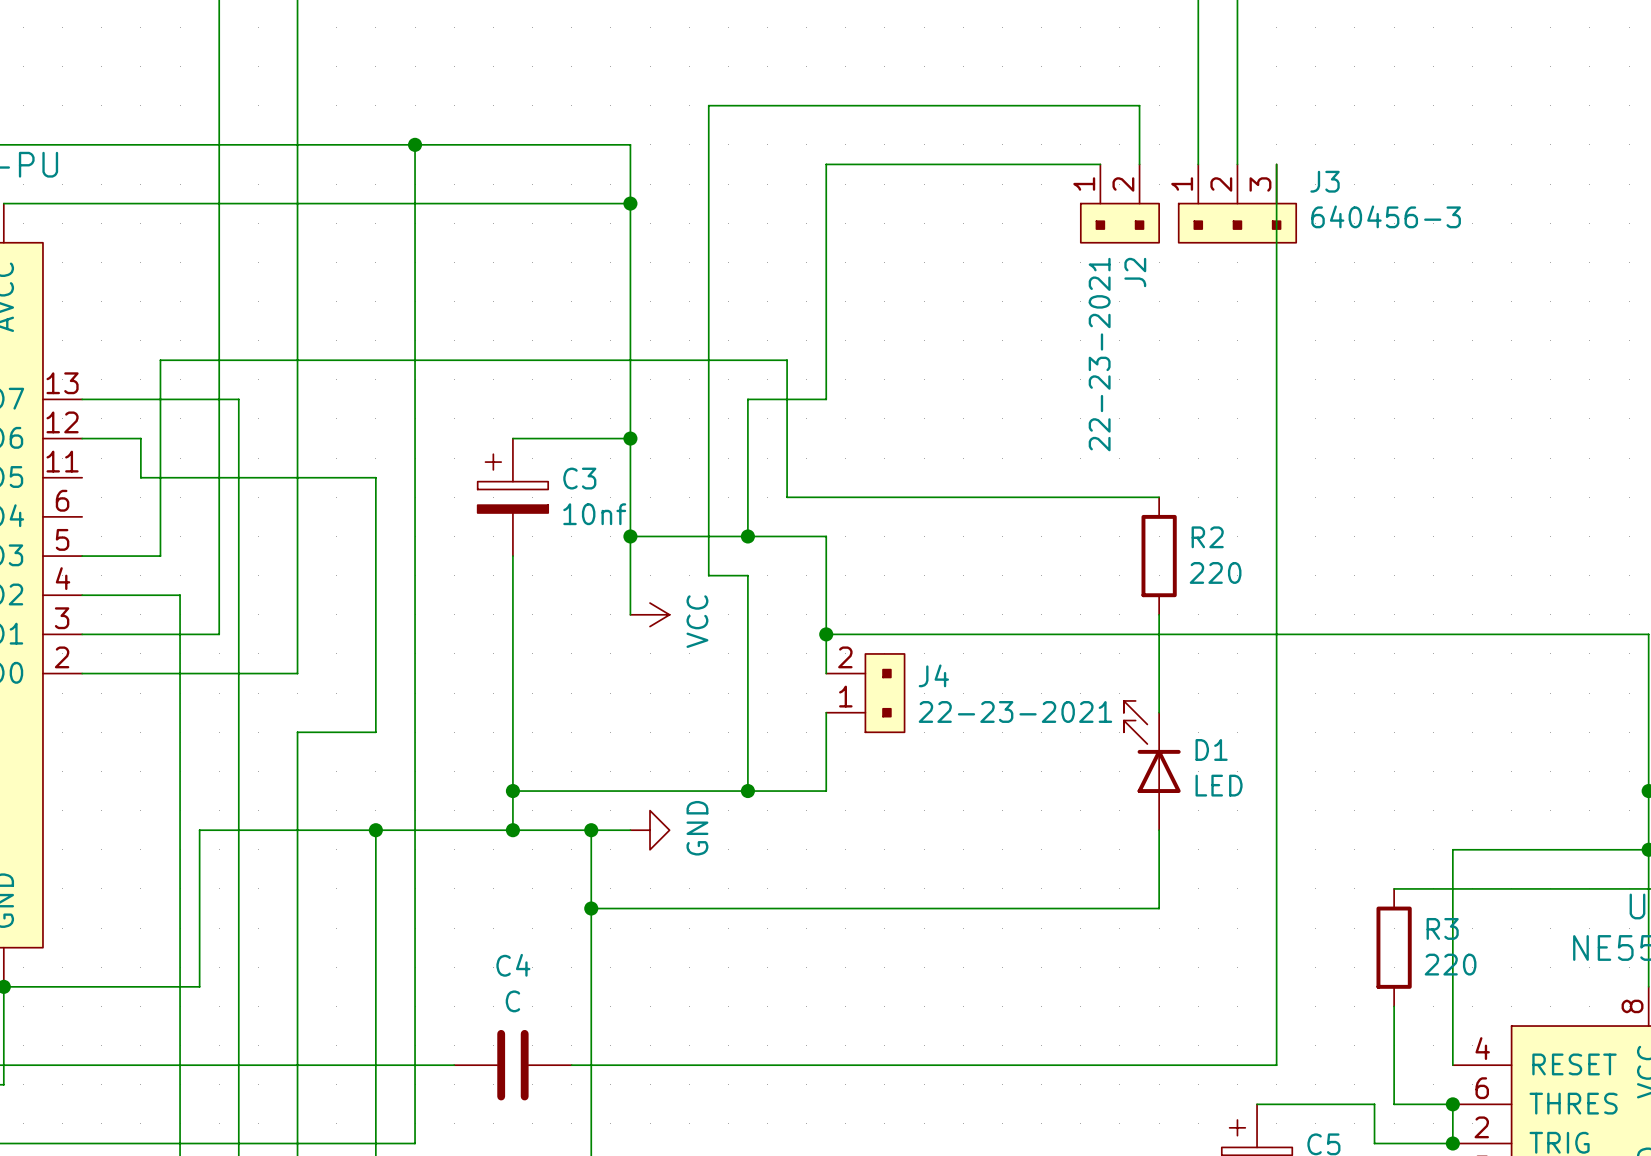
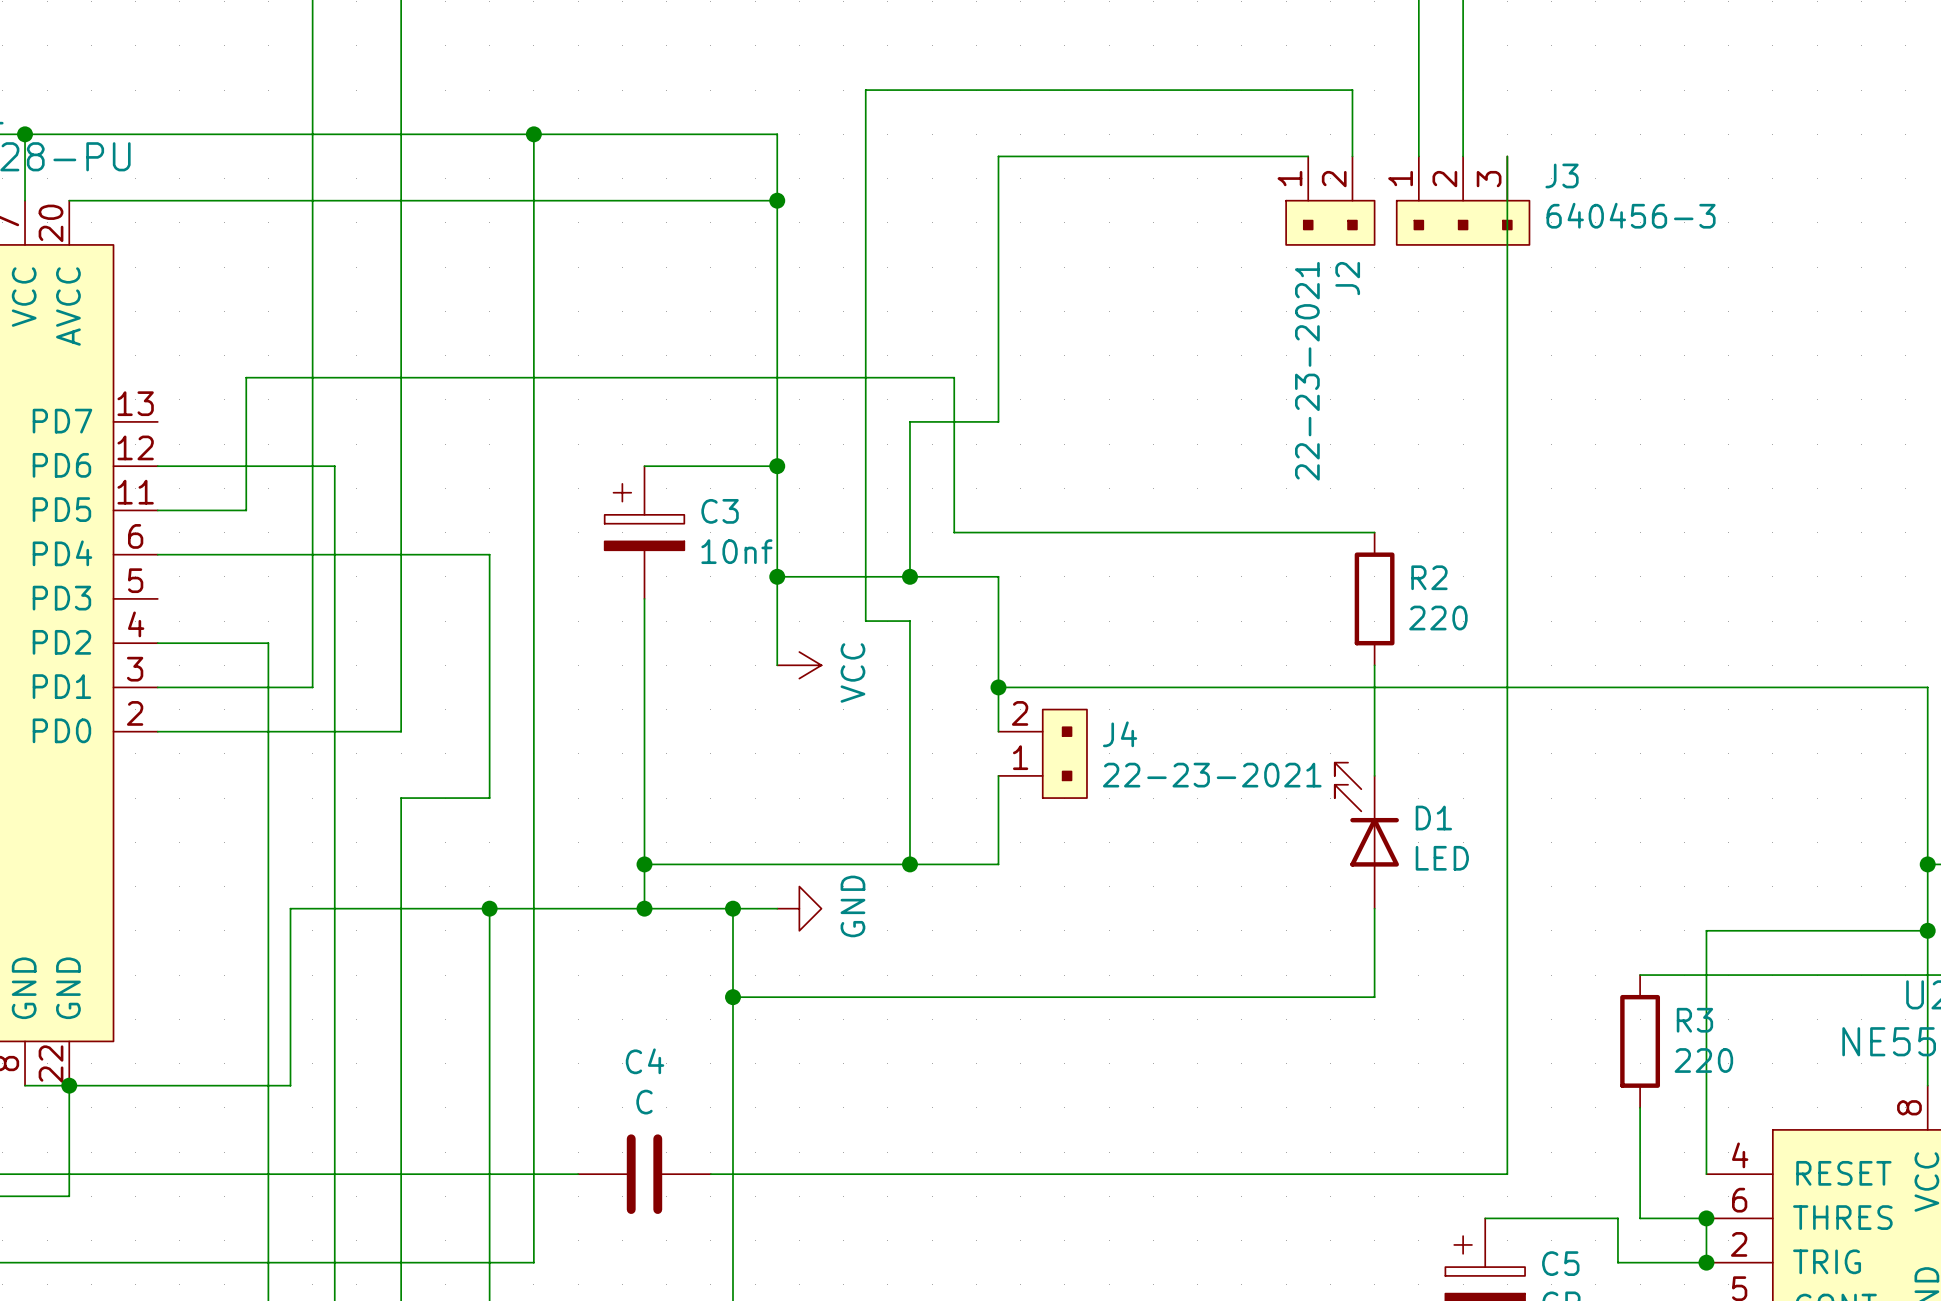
wire: (82, 399) (238, 399) (238, 438) -> (224, 466) (334, 466)
wire: (140, 438) (140, 477) -> (157, 510) (224, 510)
wire: (375, 516) (375, 477) (160, 477) (160, 556) (82, 556) -> (489, 554) (157, 554)

